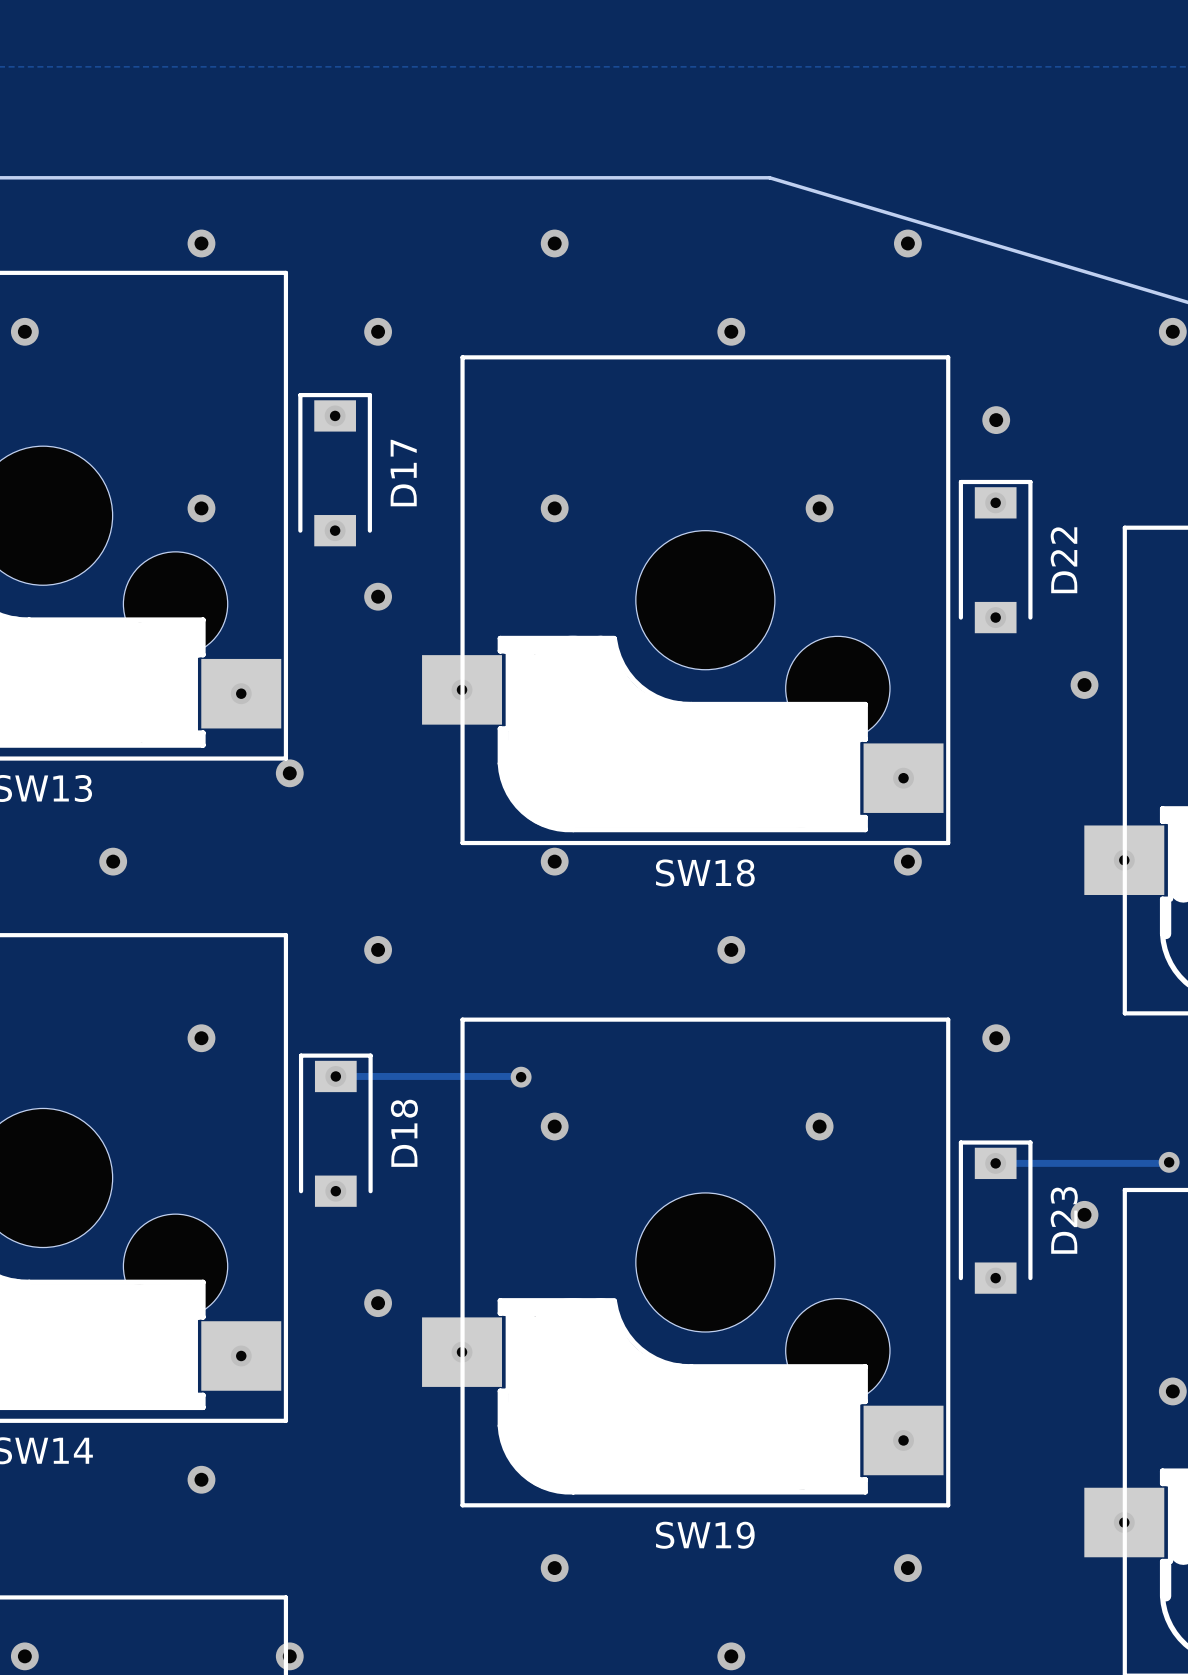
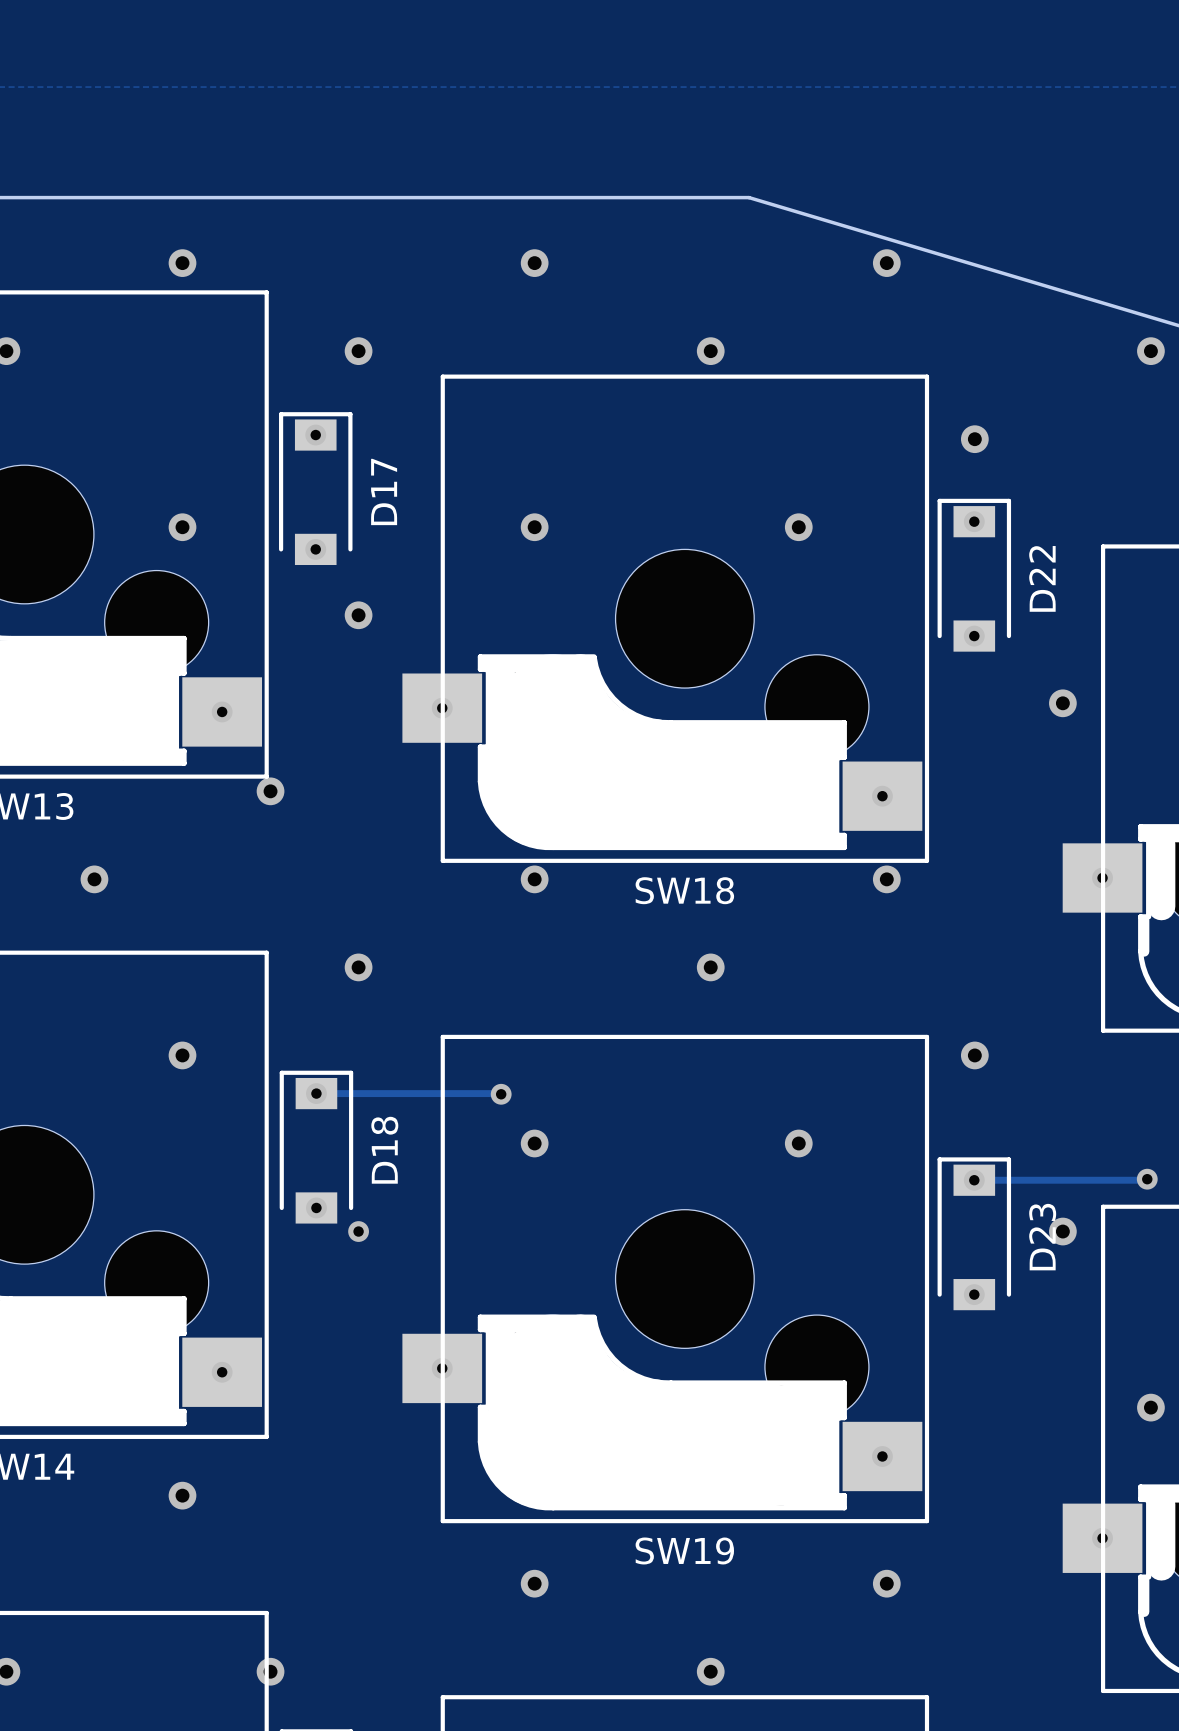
via: none -> (358, 1231)
via: (378, 1303) -> none

